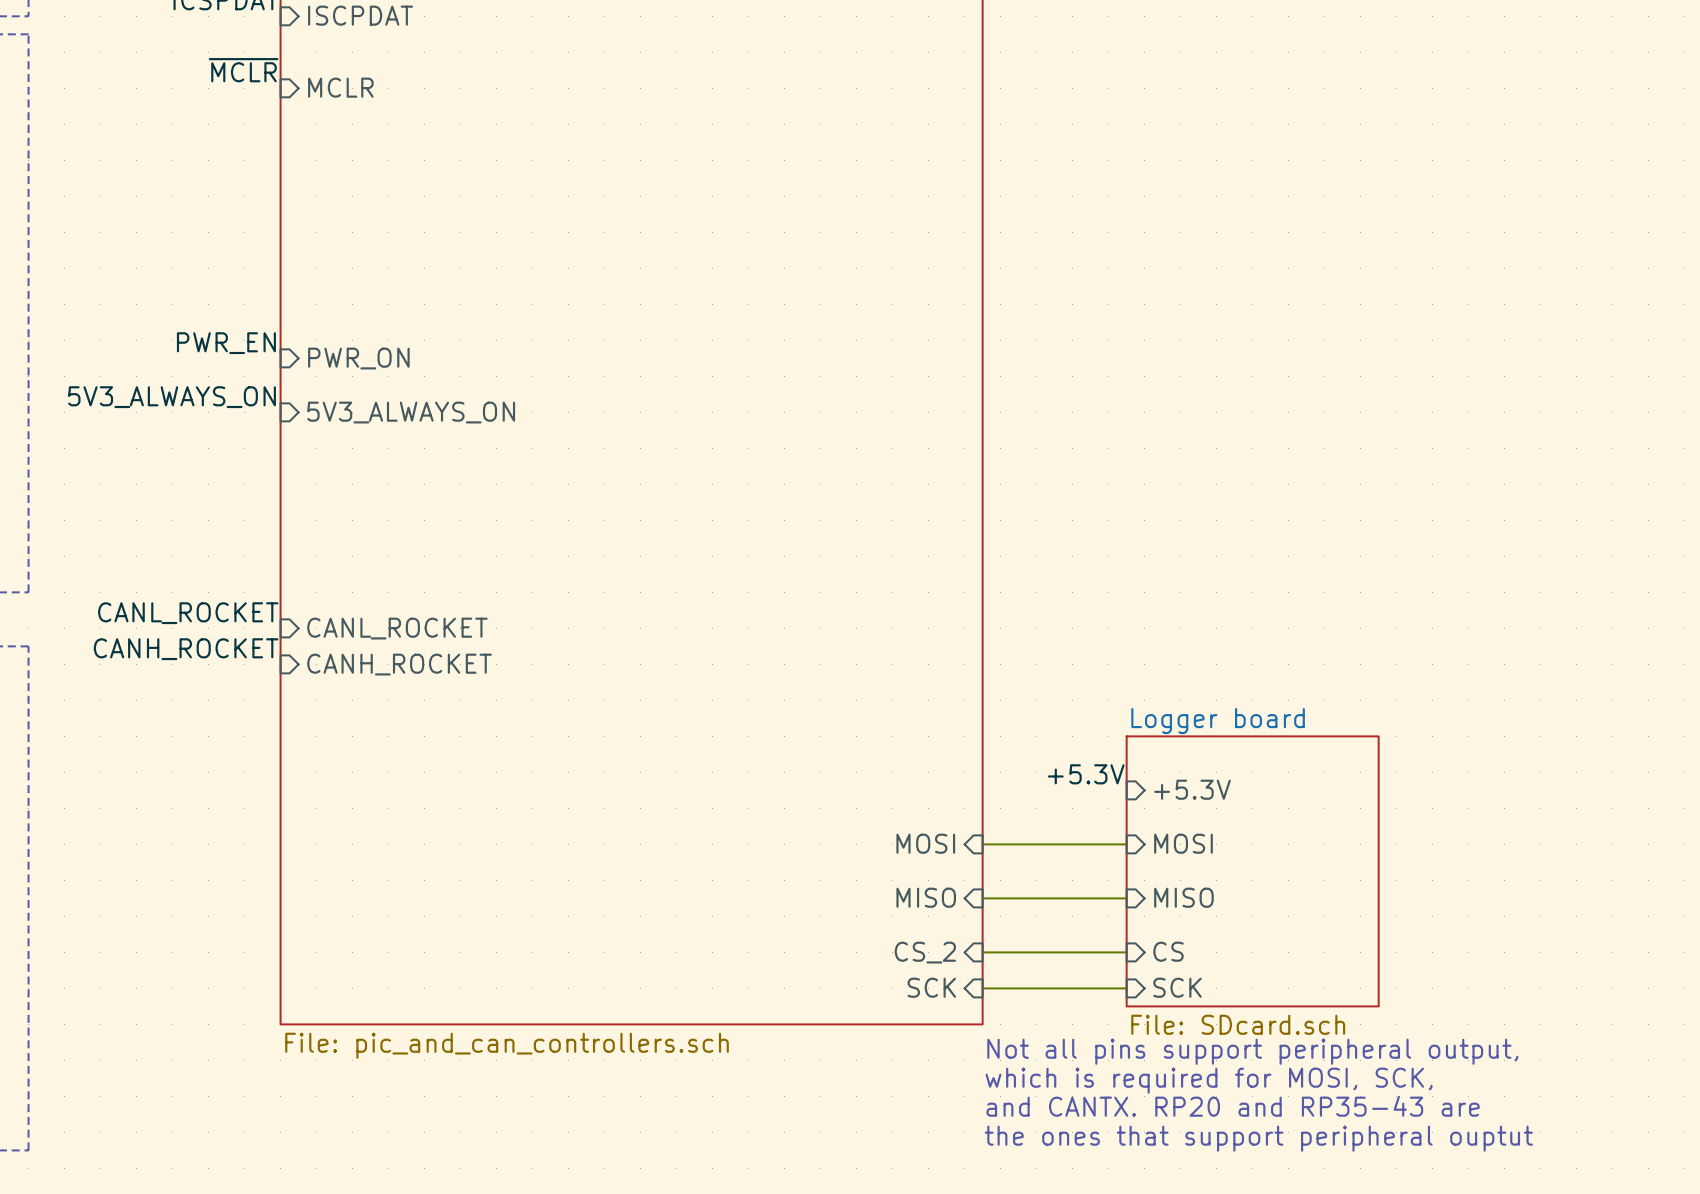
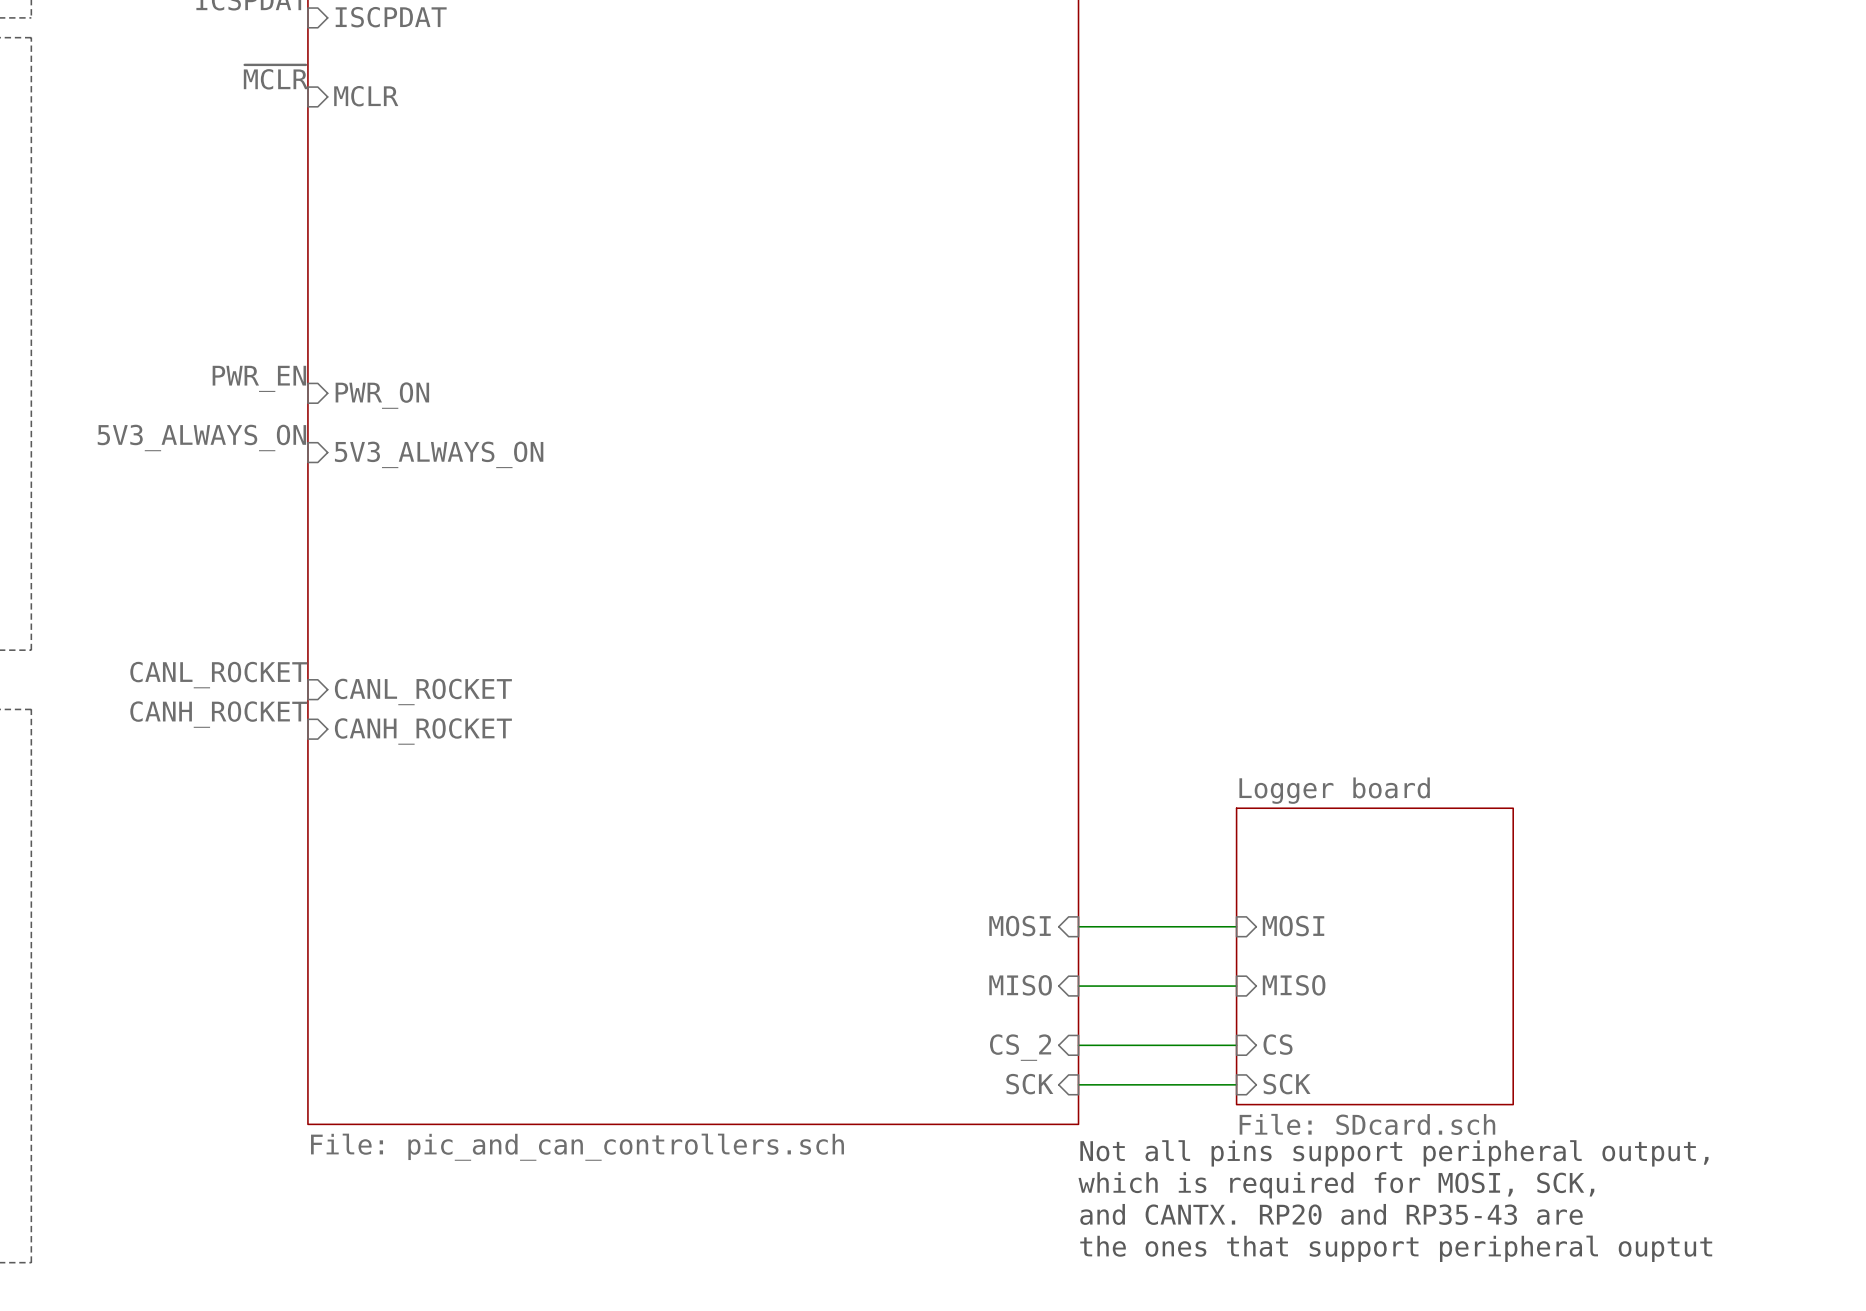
label: +5.3V (1086, 774) -> none
sheet pin: +5.3V (1192, 789) -> none

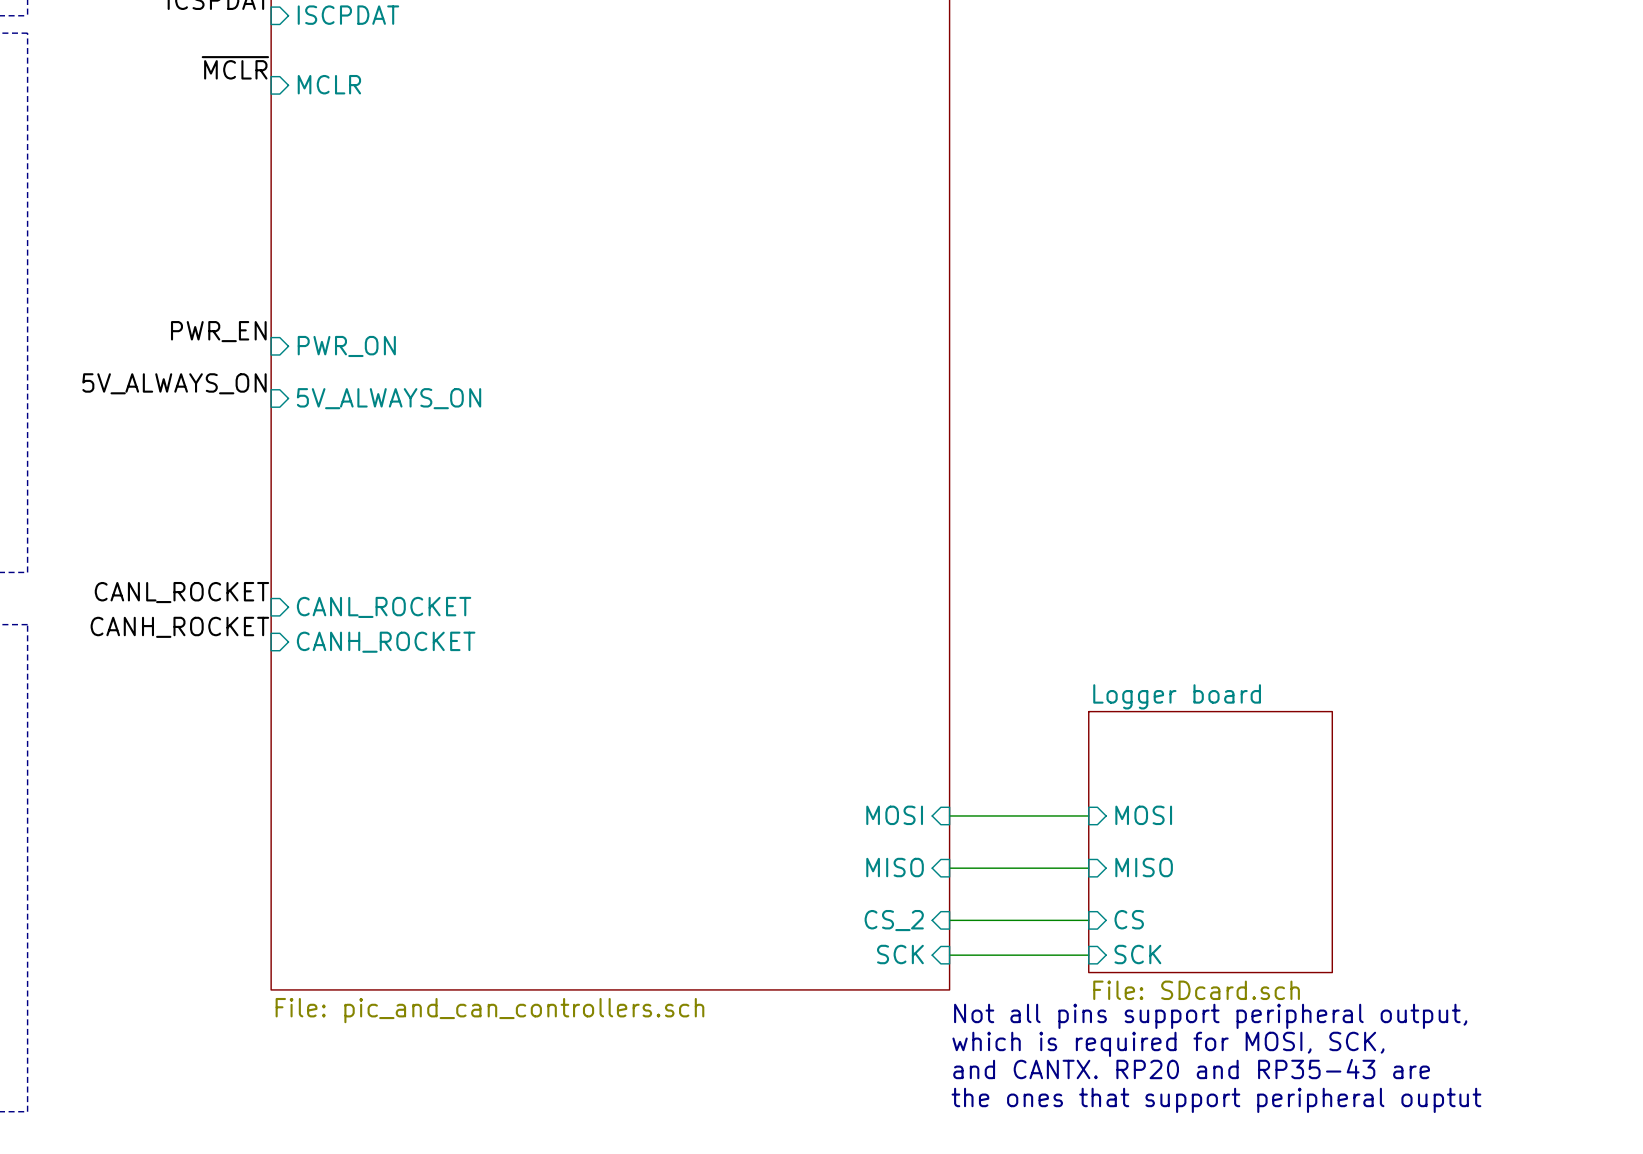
label: 5V3_ALWAYS_ON (201, 437) -> 5V_ALWAYS_ON (174, 383)
sheet pin: 5V3_ALWAYS_ON (439, 454) -> 5V_ALWAYS_ON (389, 398)

